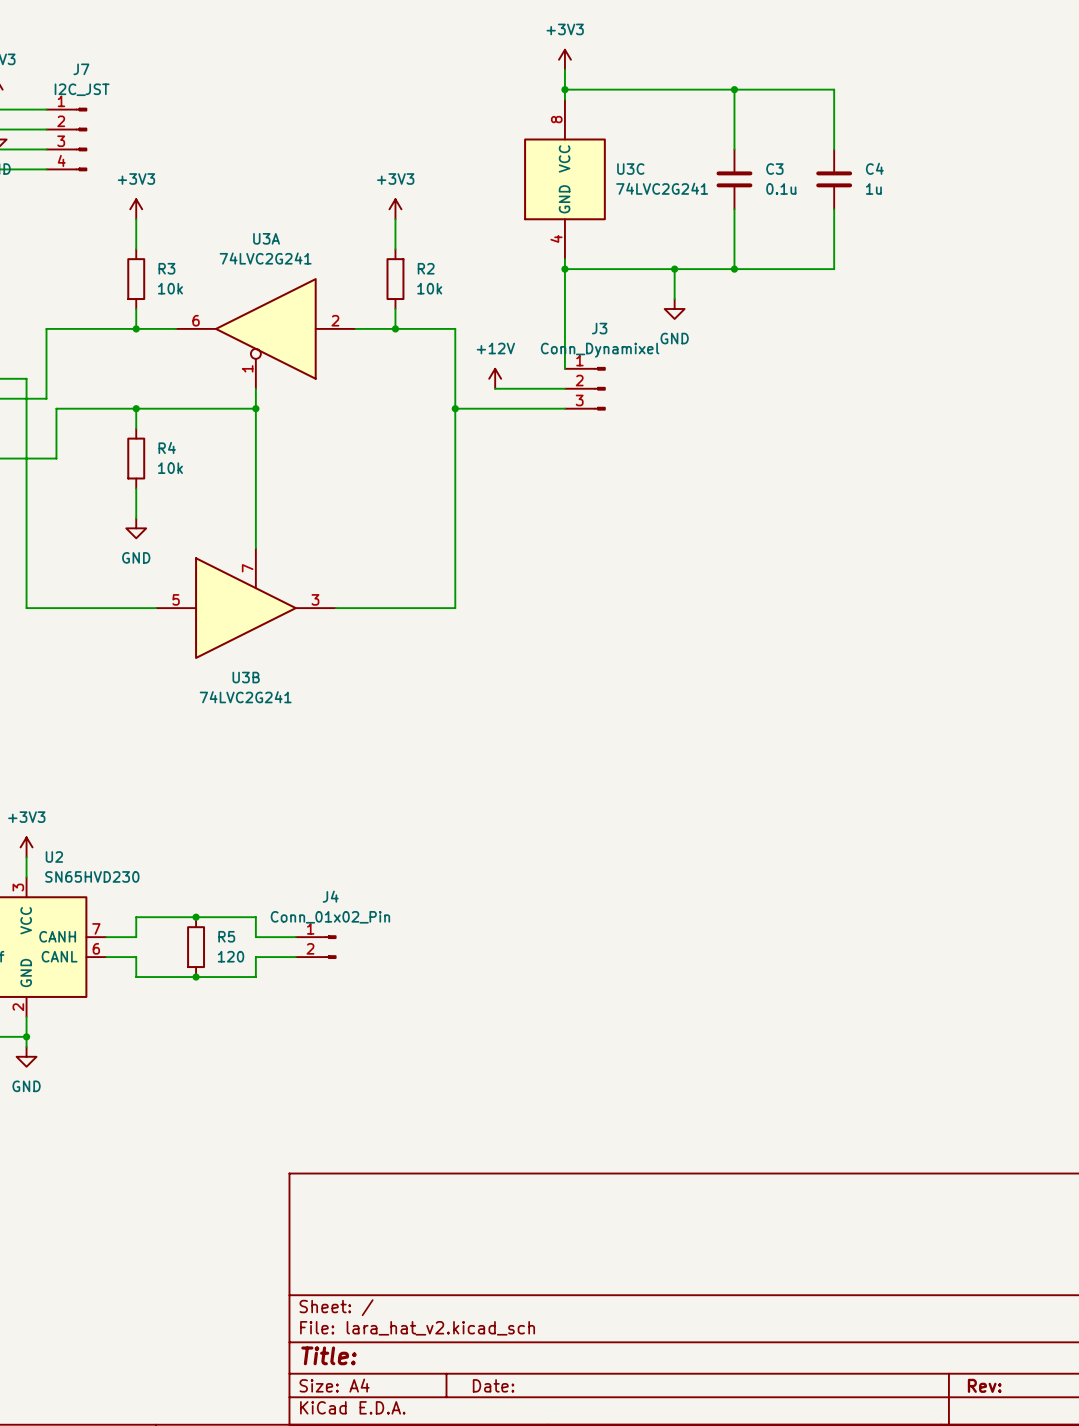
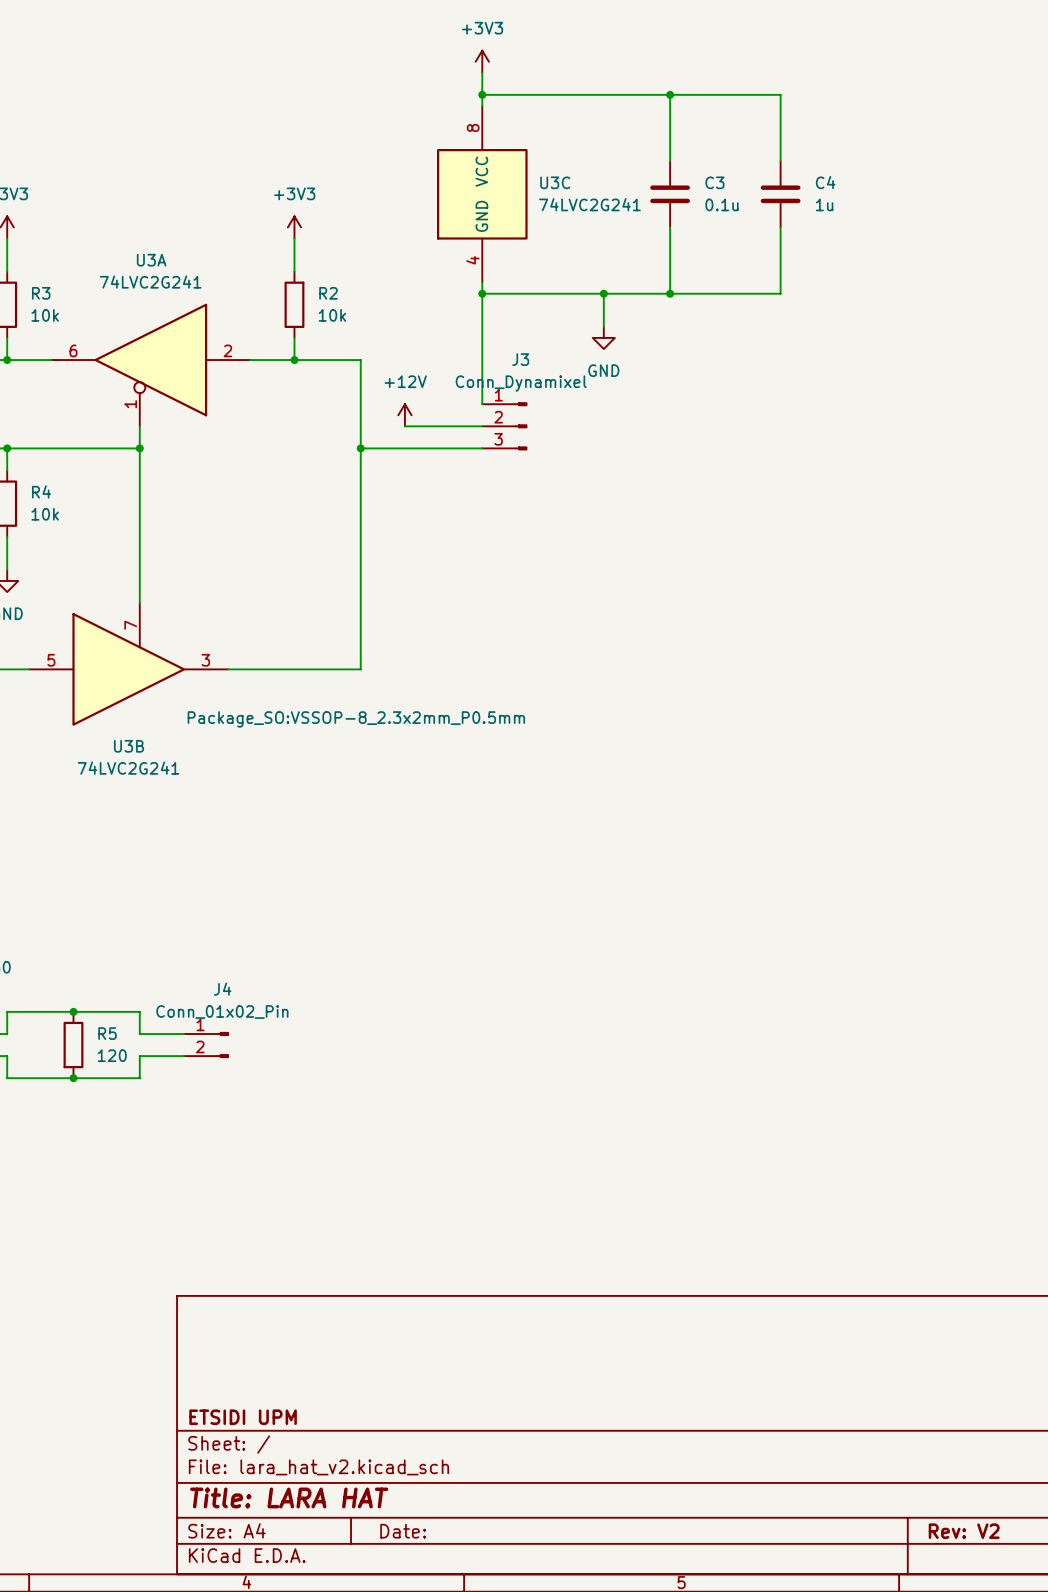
U3B text: none -> Package_SO:VSSOP-8_2.3x2mm_P0.5mm (356, 719)
title block: none -> ETSIDI UPM (243, 1417)
title block: Title: (328, 1355) -> Title: LARA HAT (289, 1497)
title block: Rev: (984, 1385) -> Rev: V2 (964, 1531)

